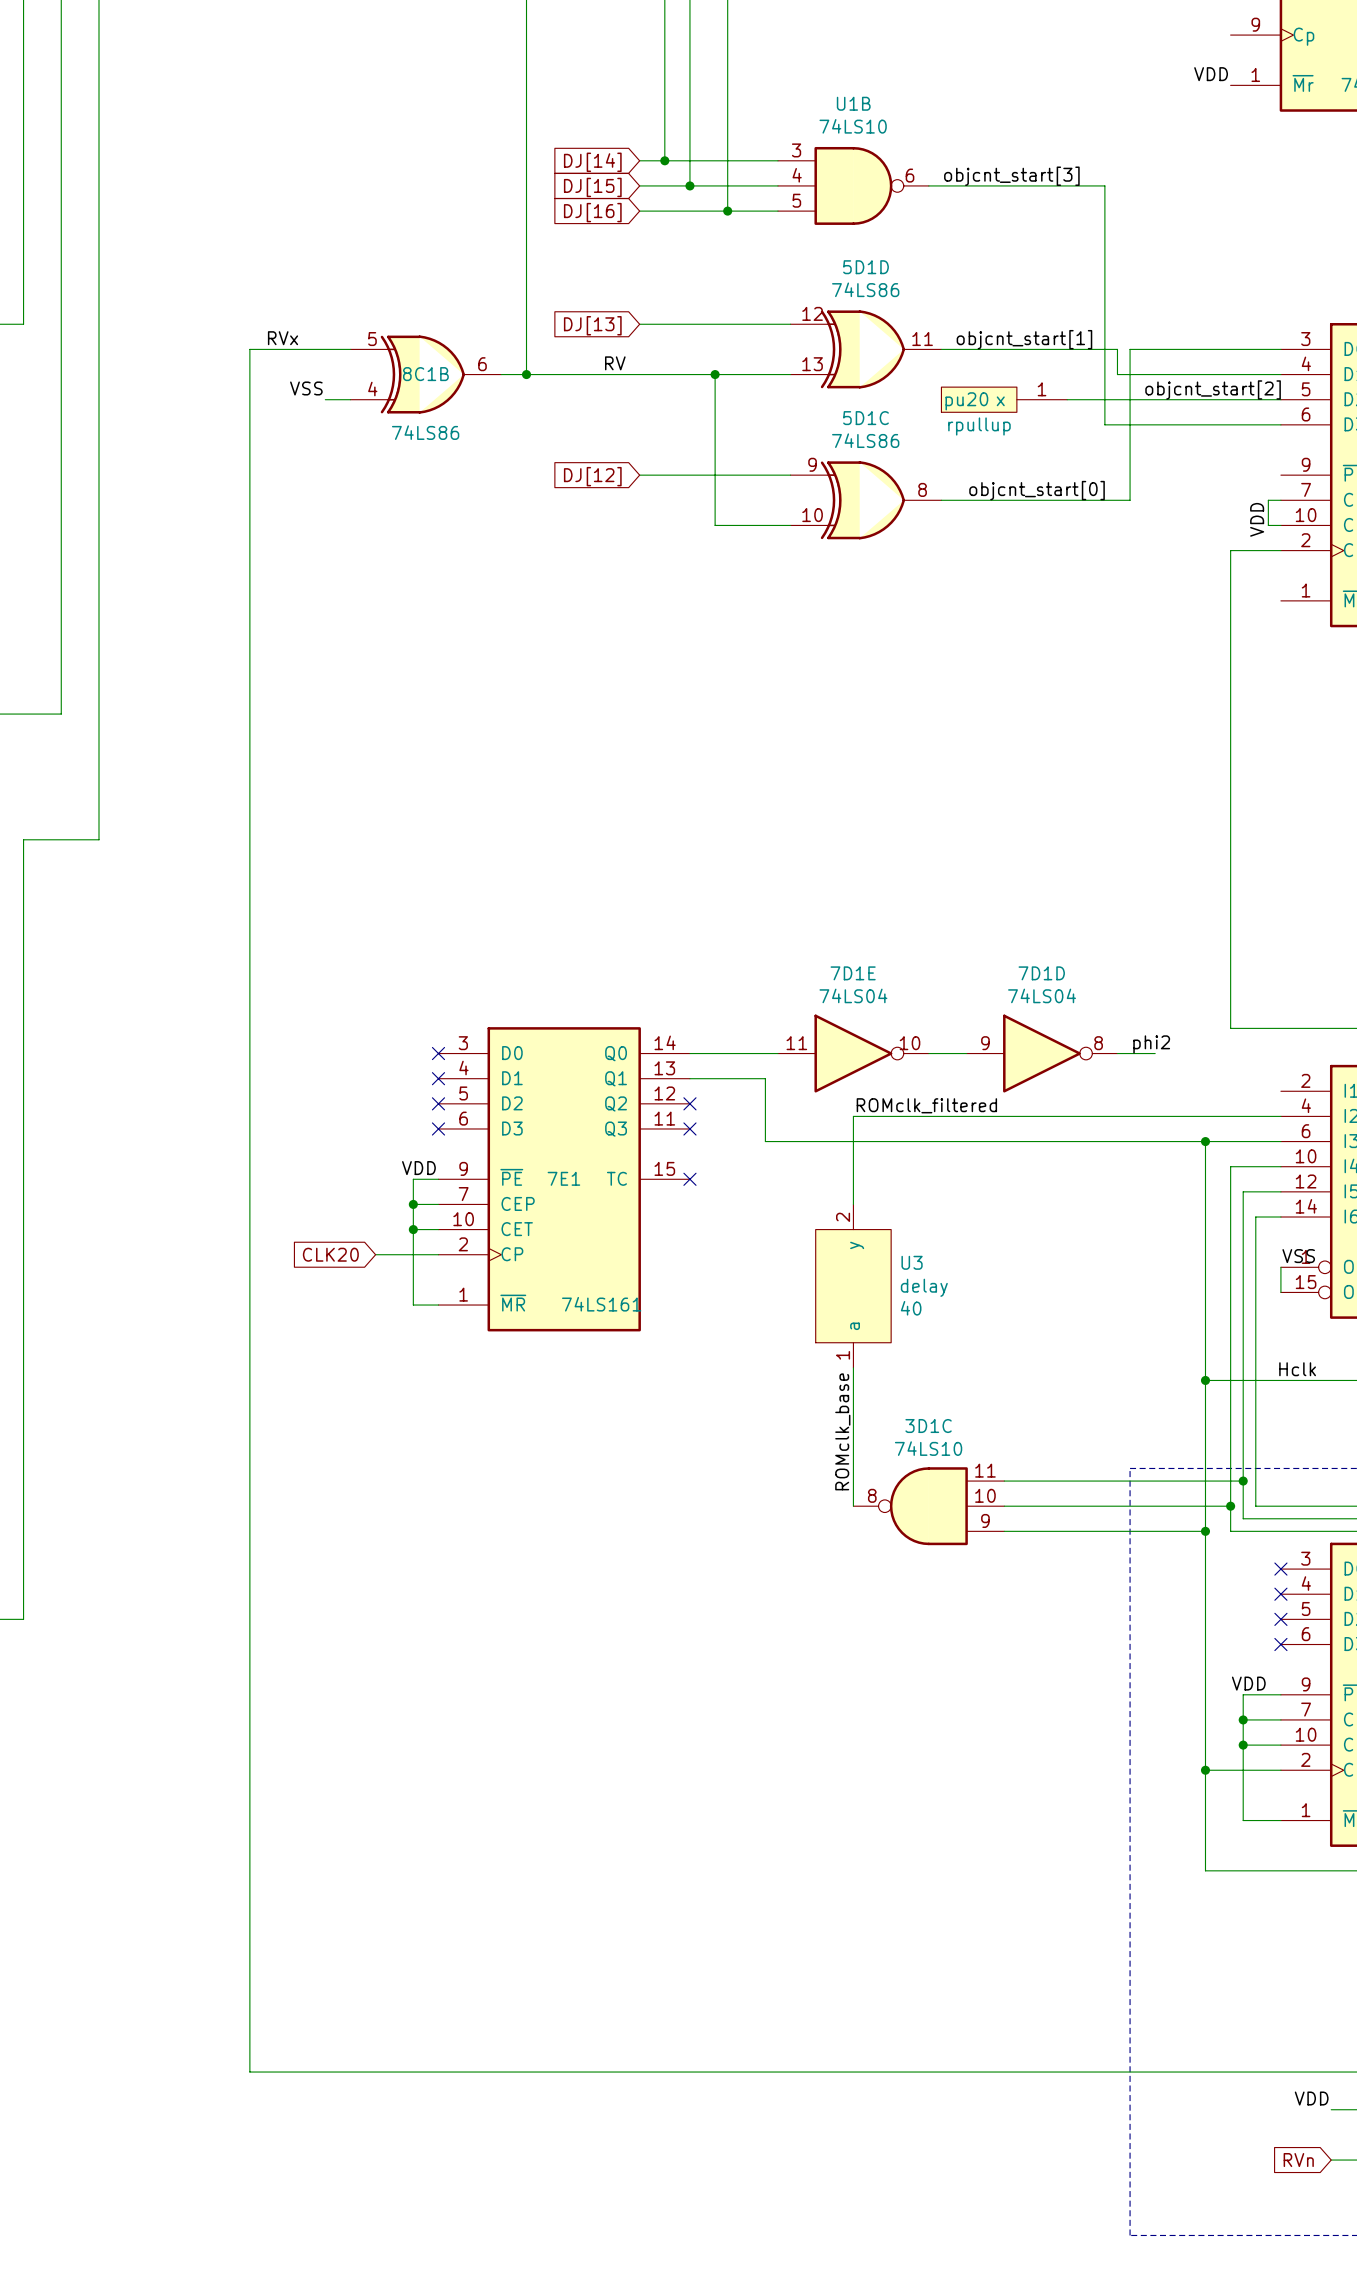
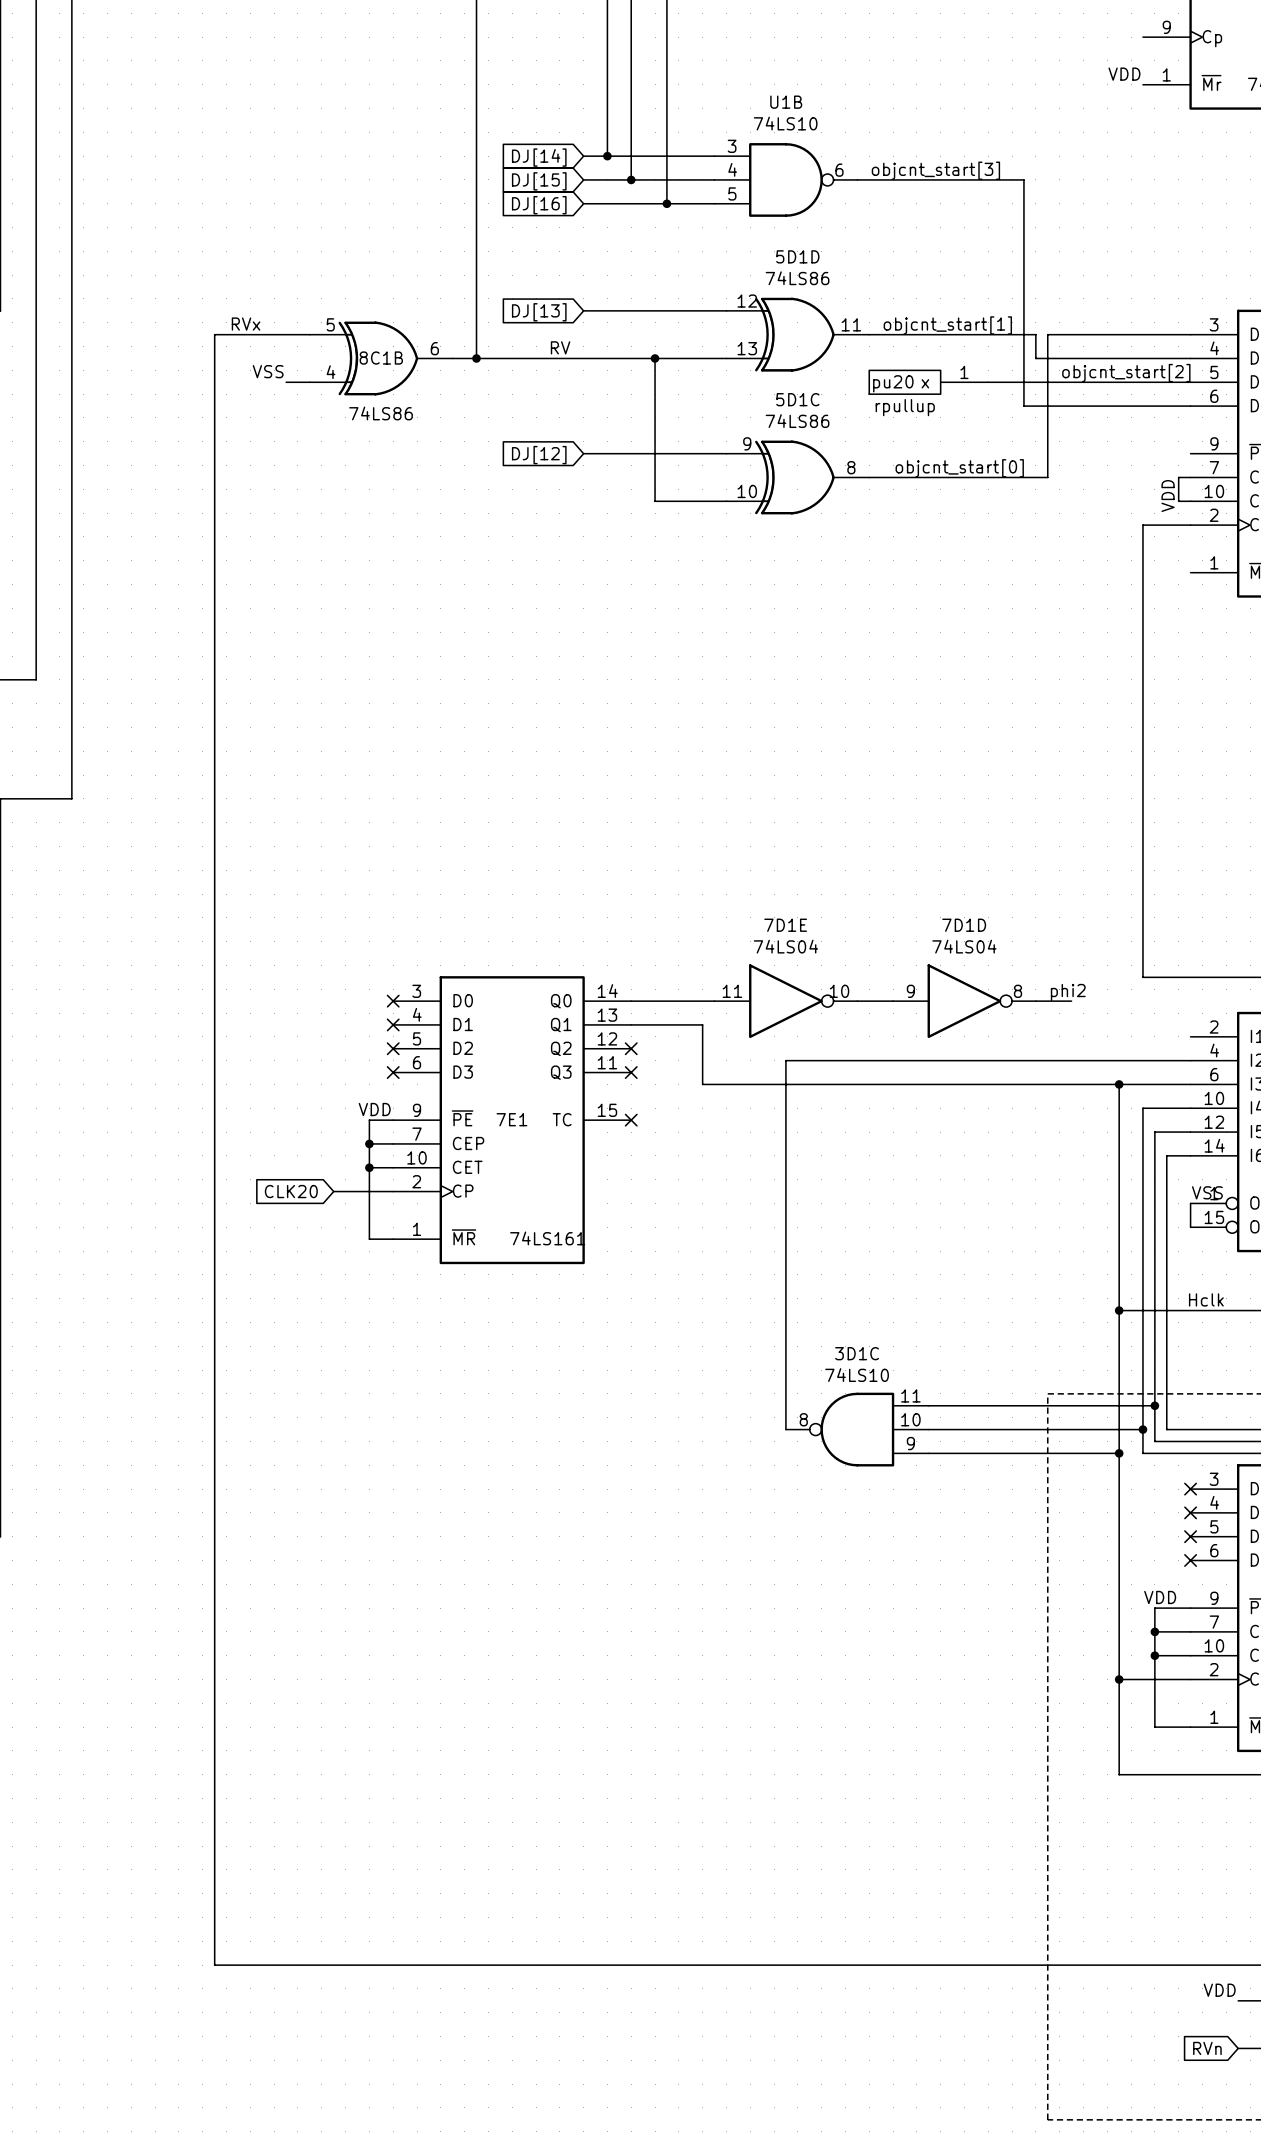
label: ROMclk_filtered (926, 1105) -> none
U3: delay (853, 1286) -> none
label: ROMclk_base (842, 1431) -> none

